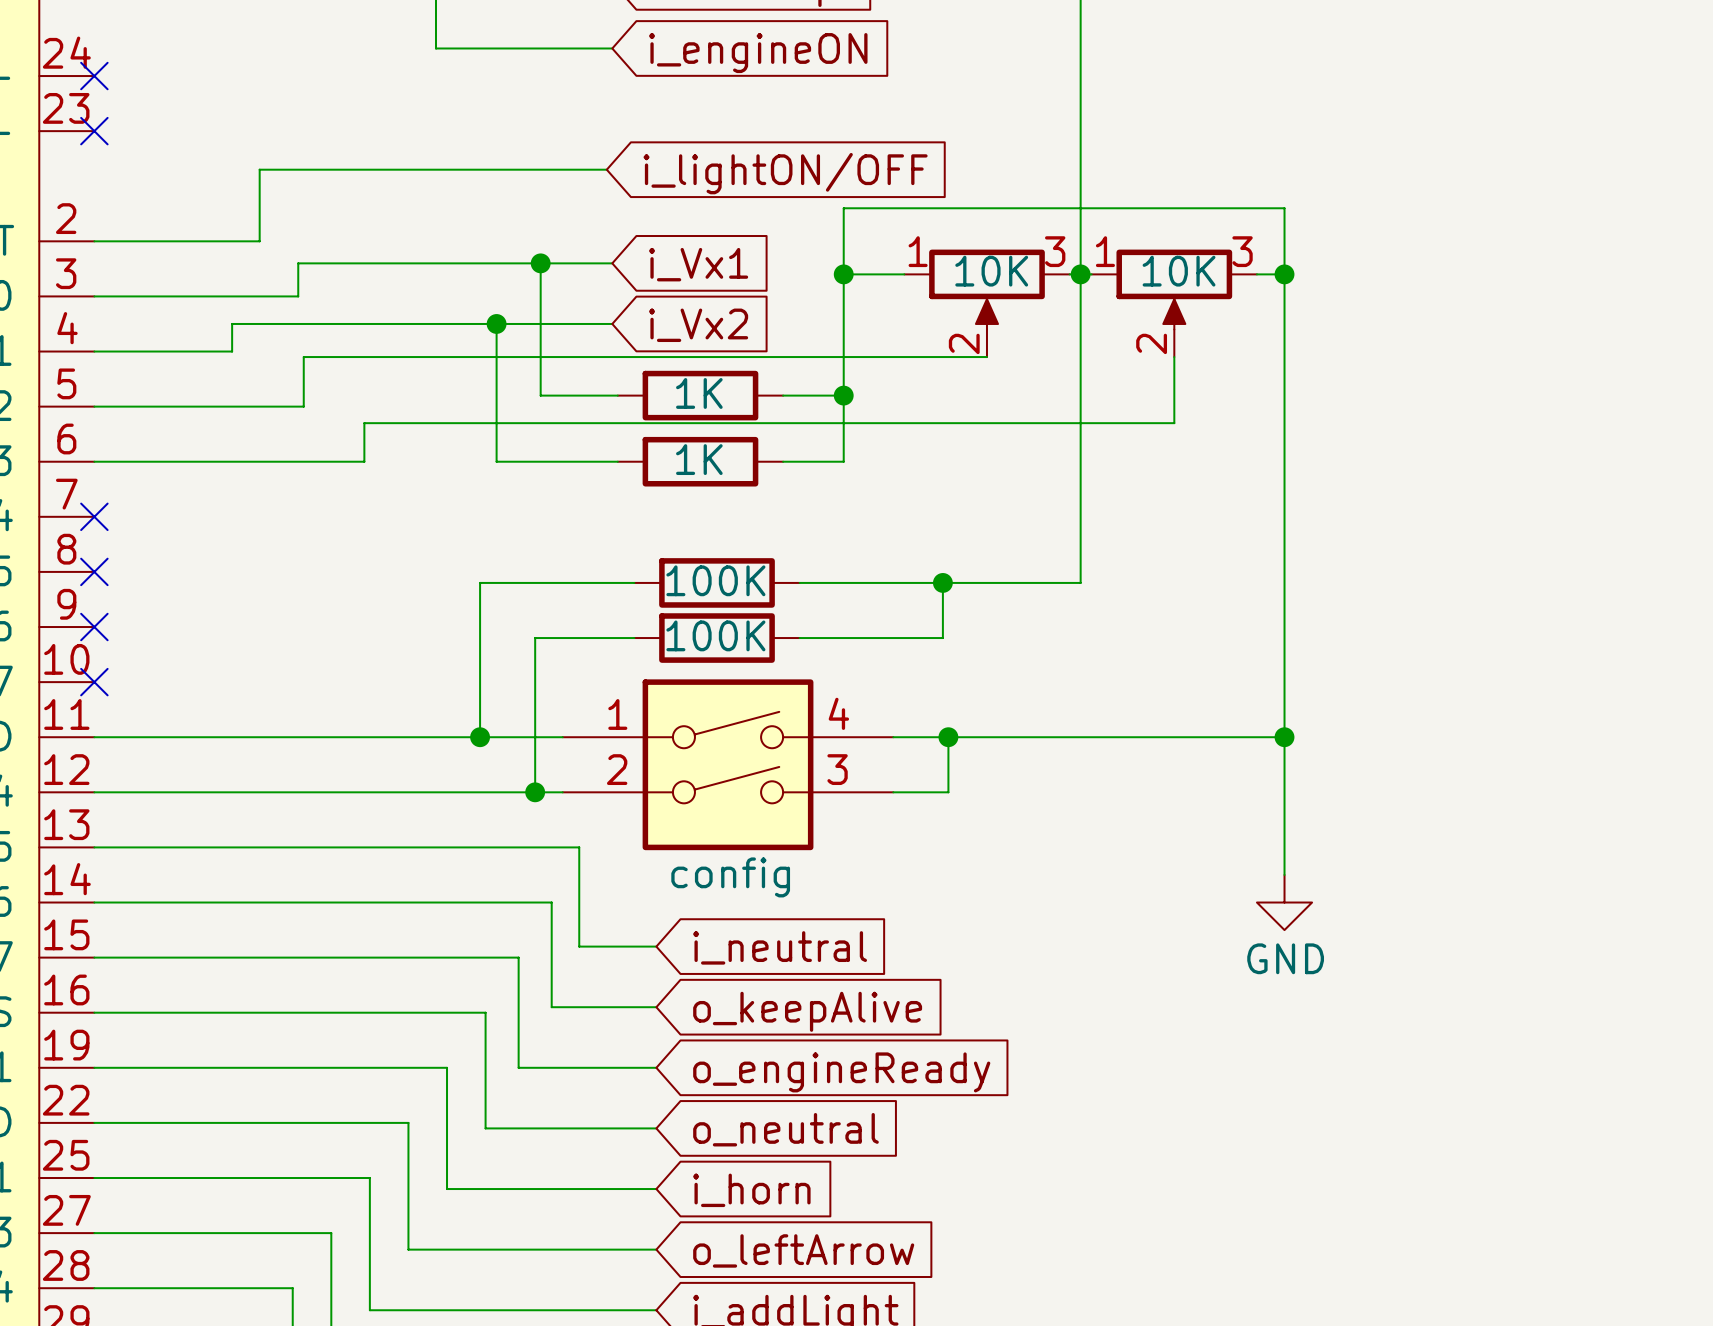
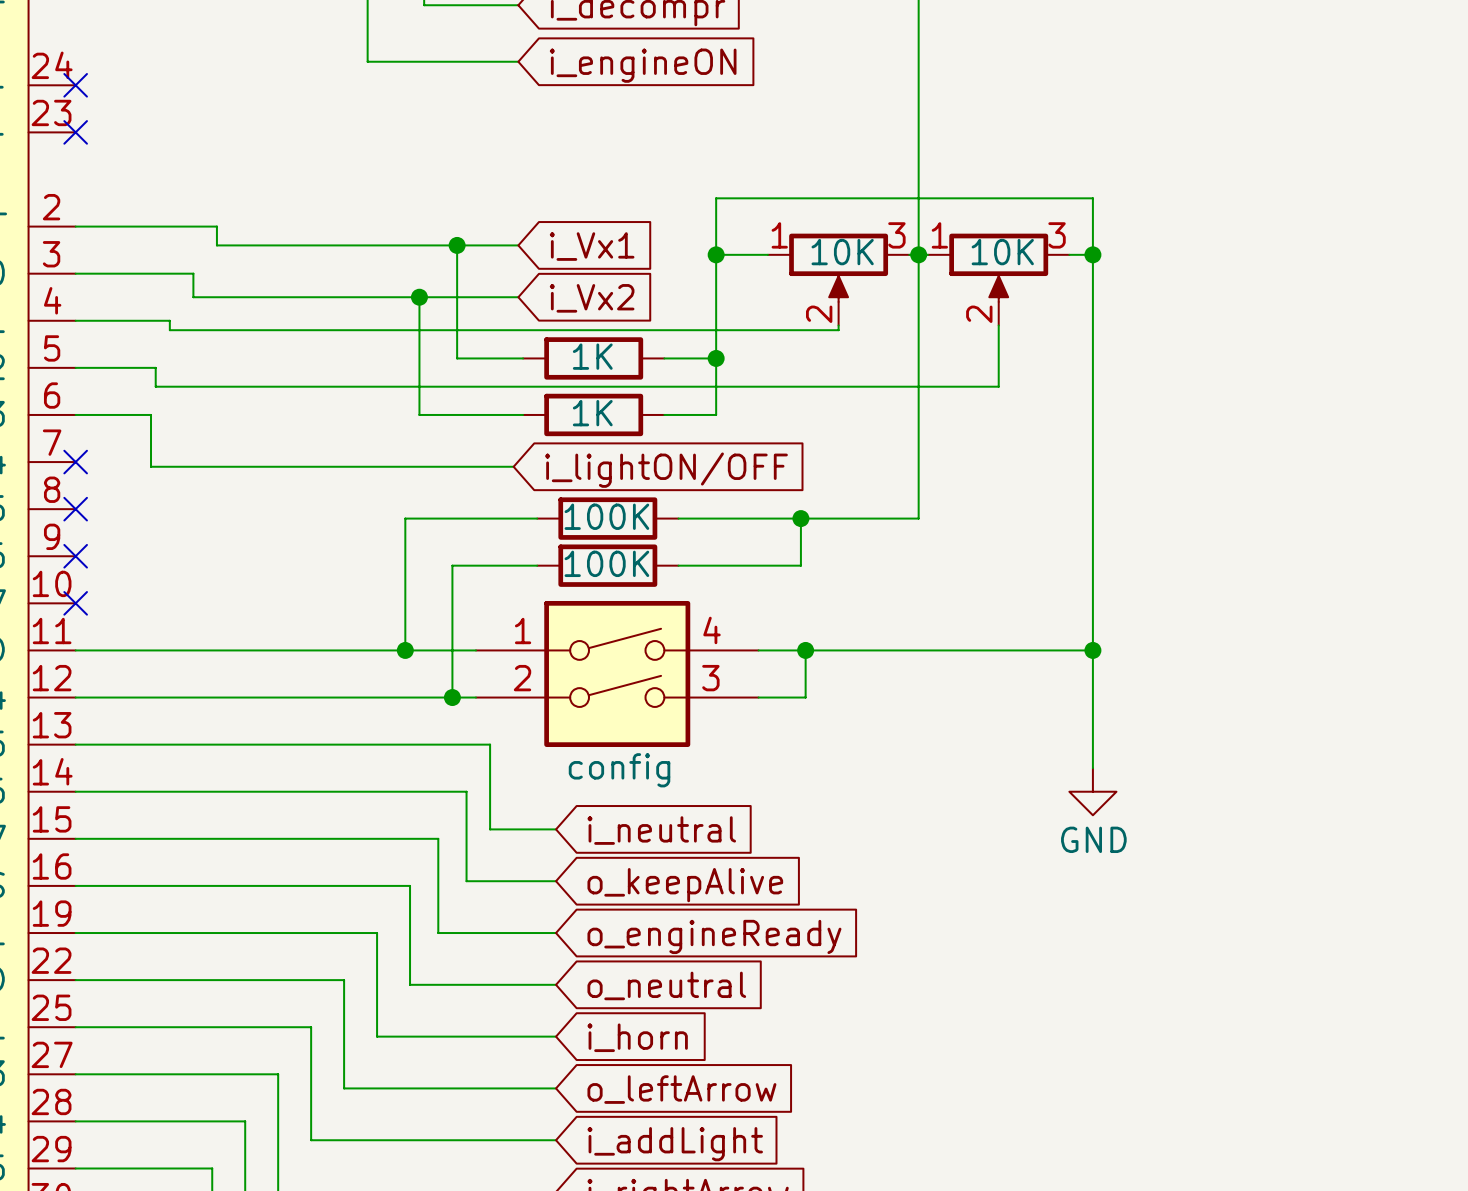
wire: (606, 169) (259, 169) (259, 241) -> none
global label position: i_lightON/OFF (785, 173) -> i_lightON/OFF (666, 470)
wire: (298, 263) (298, 296) (232, 296) -> (249, 245) (216, 245) (216, 226)
wire: (232, 323) (232, 351) (204, 351) -> (193, 297) (193, 273)
wire: (986, 357) (303, 357) (303, 406) (188, 406) -> (838, 325) (838, 330) (169, 330) (169, 320)
wire: (1174, 423) (364, 423) (364, 461) (182, 461) -> (998, 382) (998, 386) (155, 386) (155, 367)
wire: none -> (151, 414) (151, 466) (513, 466)

